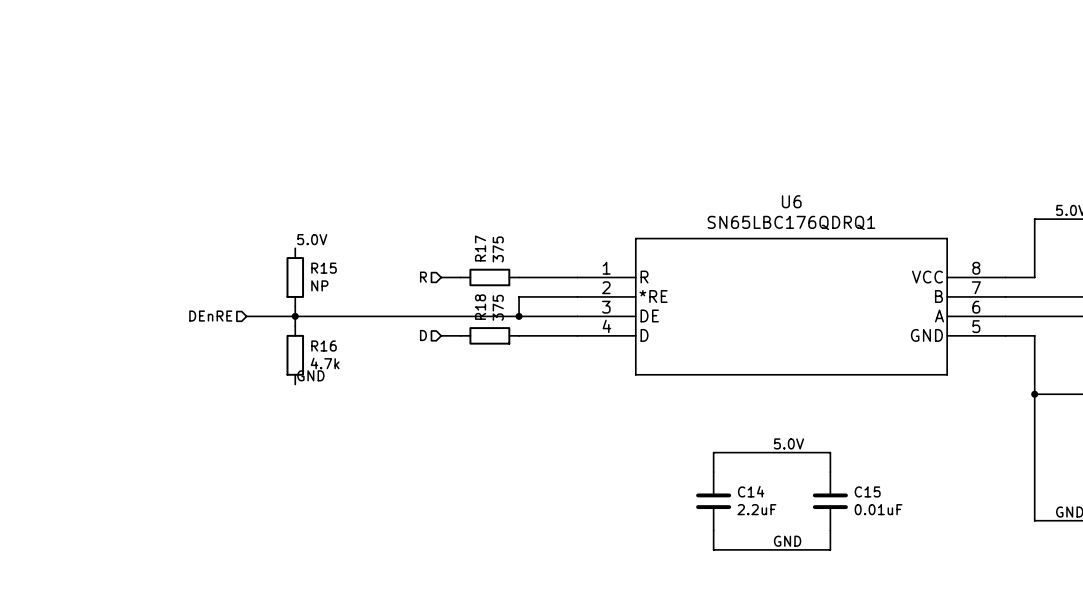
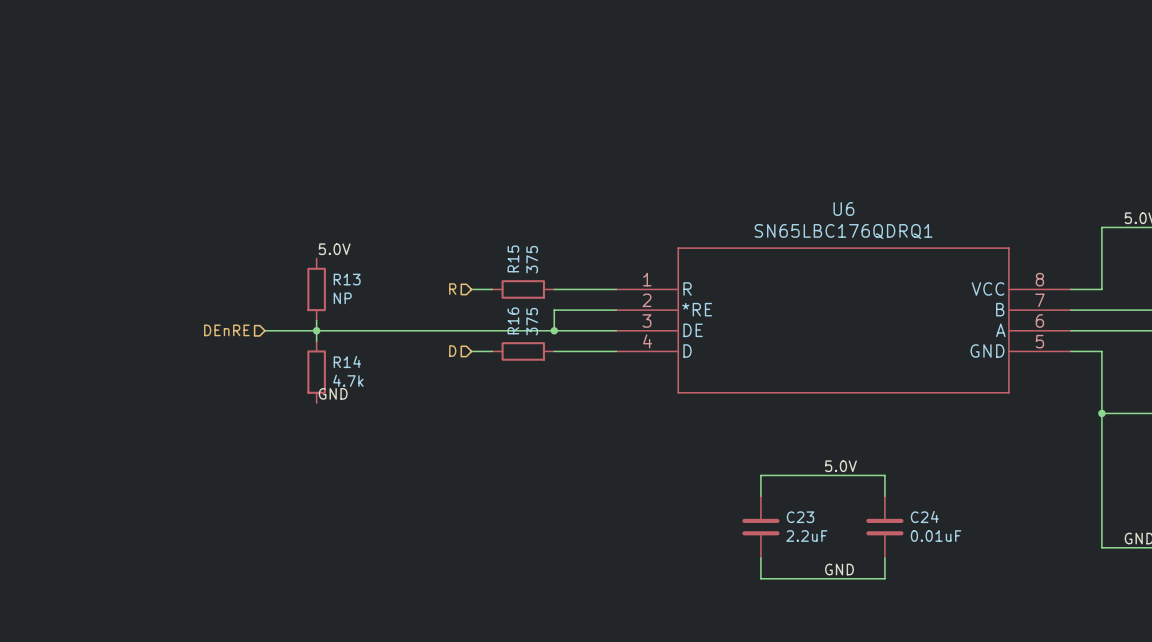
R17 name: R17 (480, 248) -> R15 (513, 258)
R15 name: R15 (324, 268) -> R13 (347, 279)
R18 name: R18 (480, 307) -> R16 (513, 320)
R16 name: R16 (324, 346) -> R14 (347, 361)
C14 name: C14 (751, 491) -> C23 (800, 517)
C15 name: C15 (867, 491) -> C24 (924, 516)

